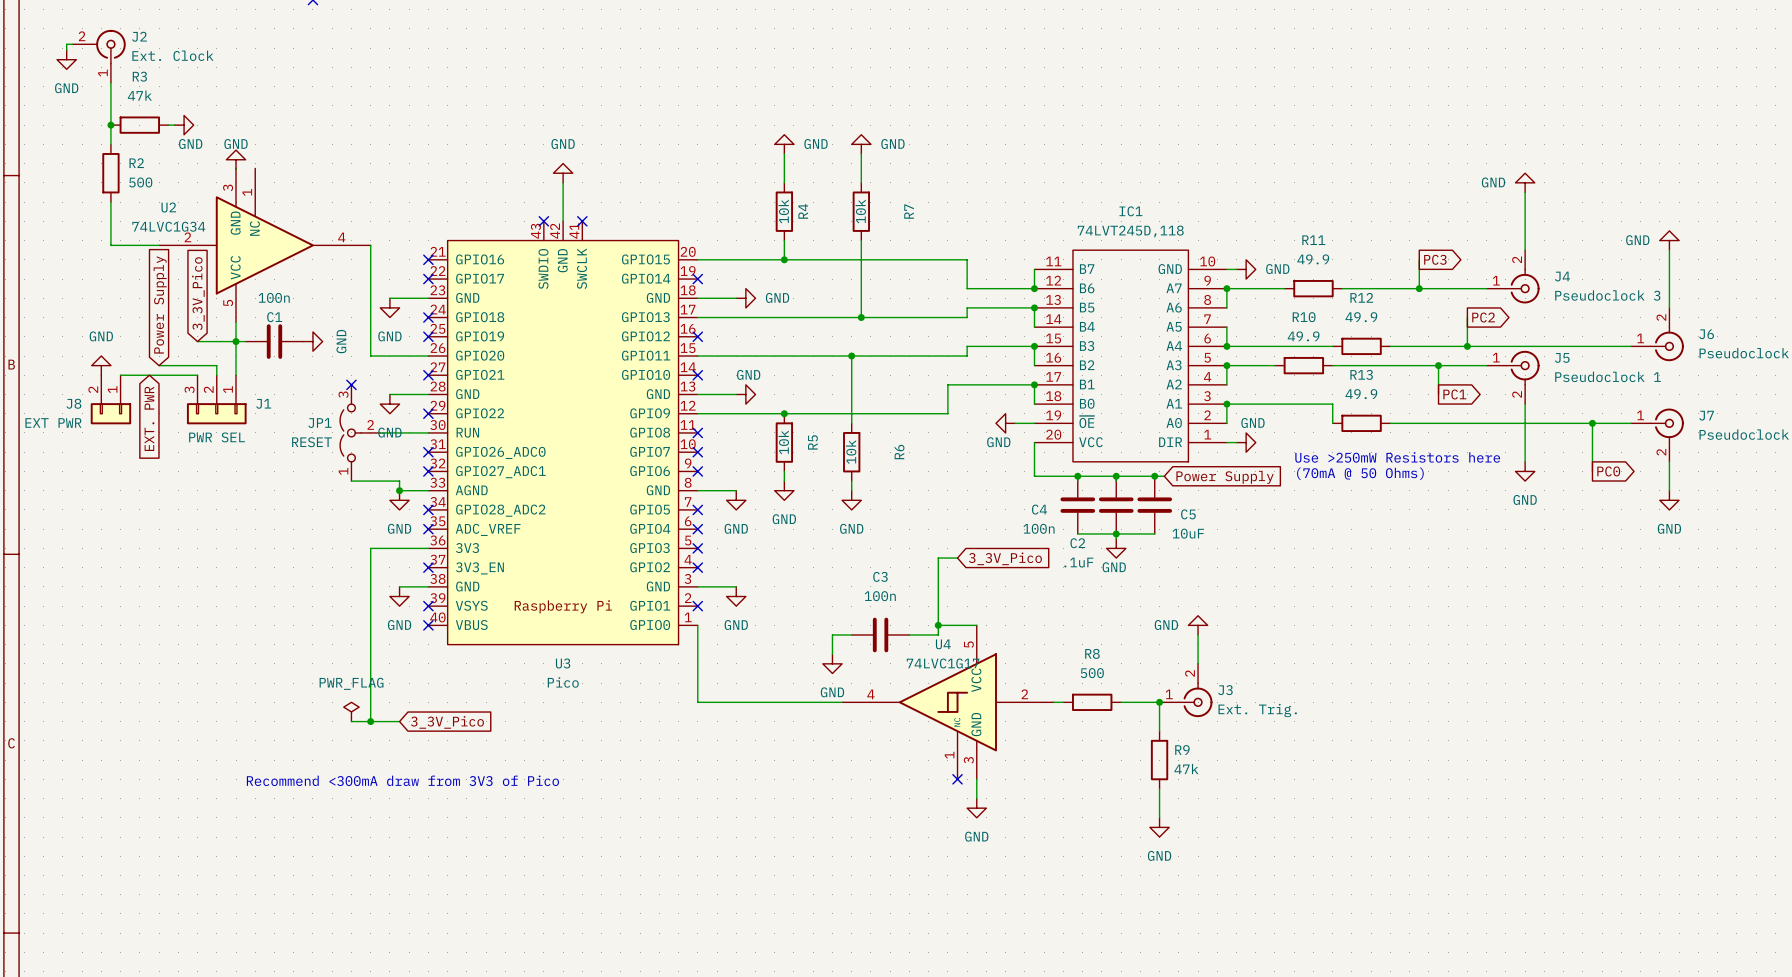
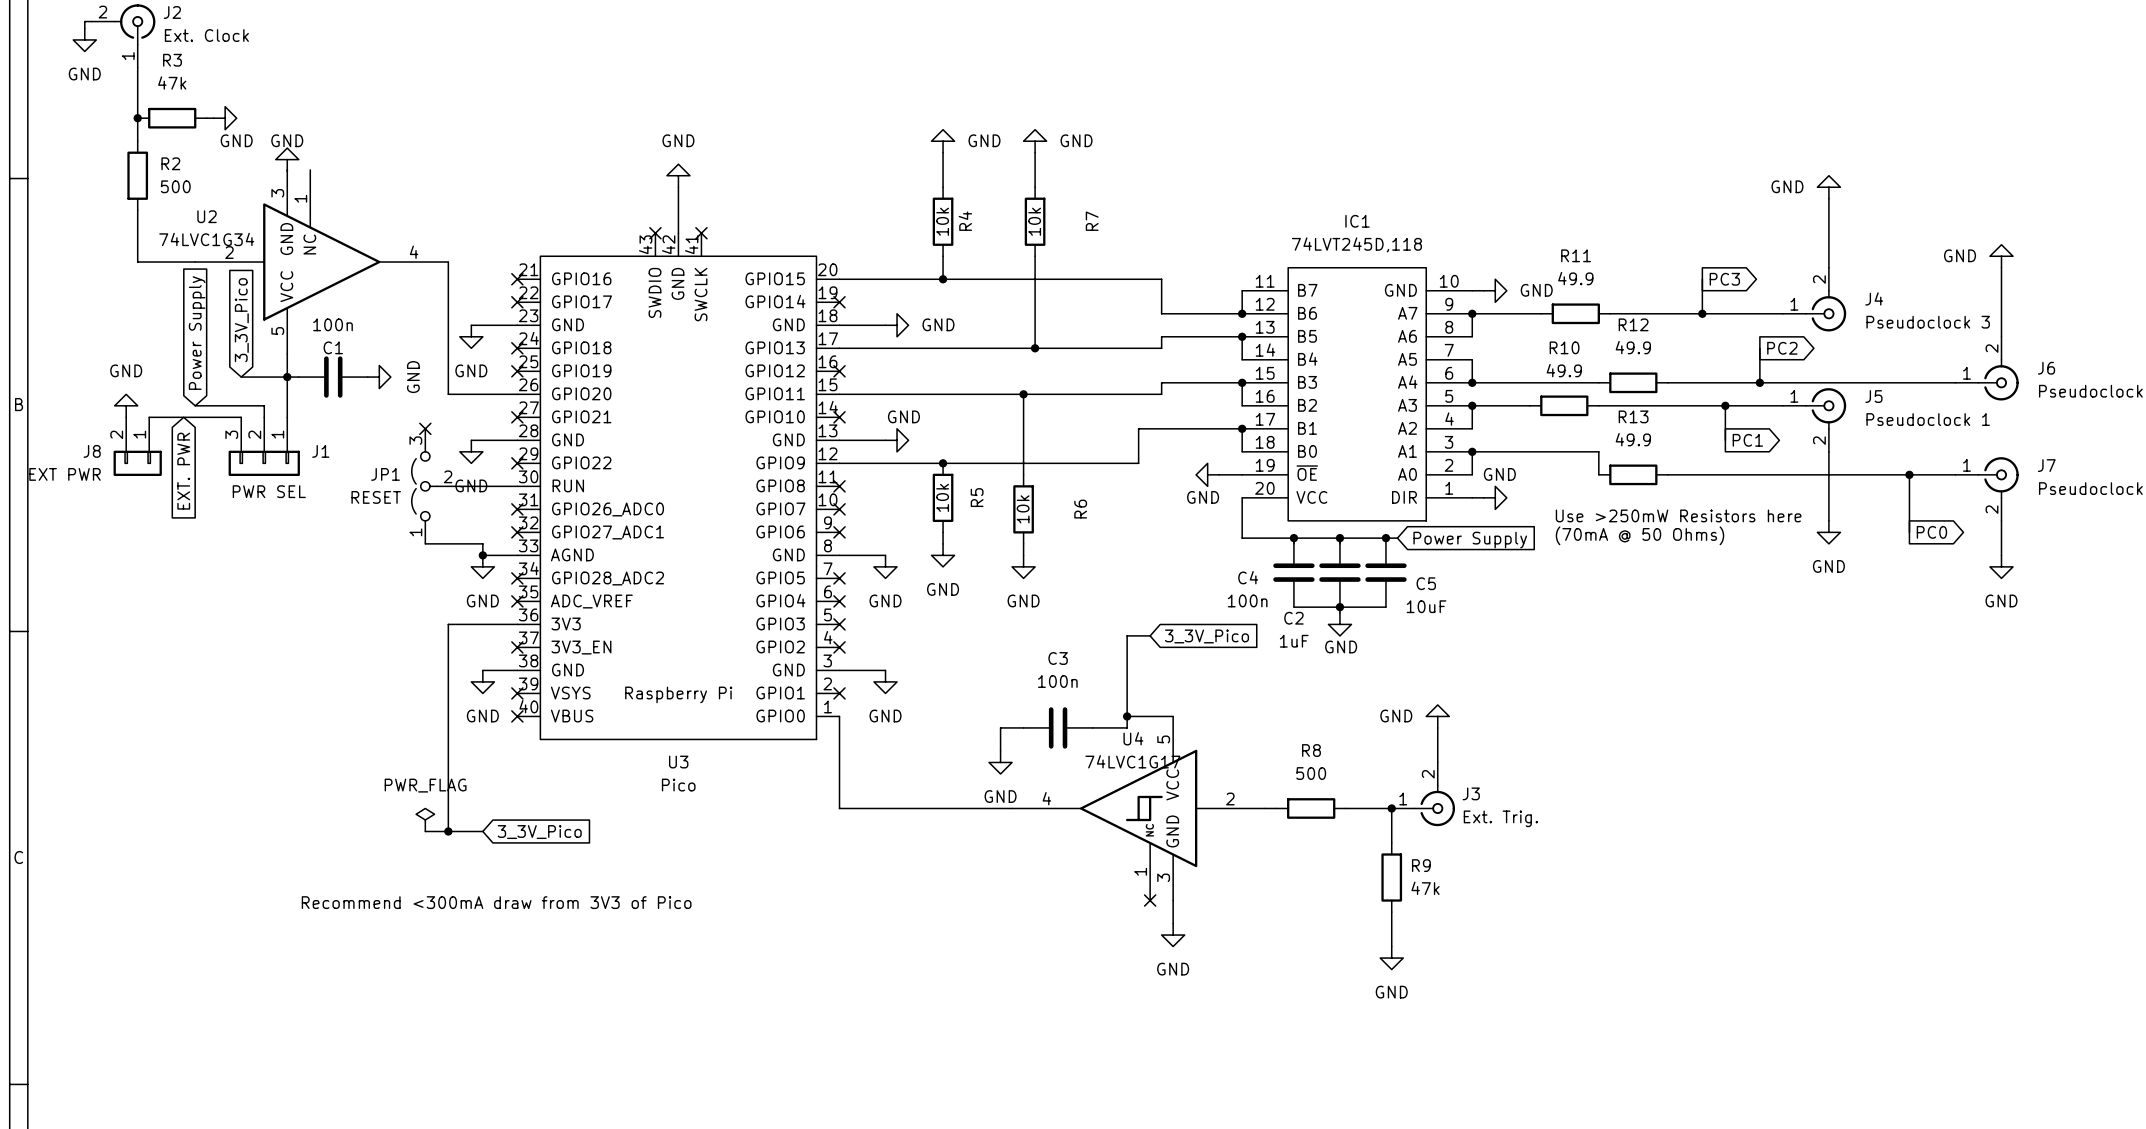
C2 value: .1uF (1078, 562) -> 1uF (1294, 641)

